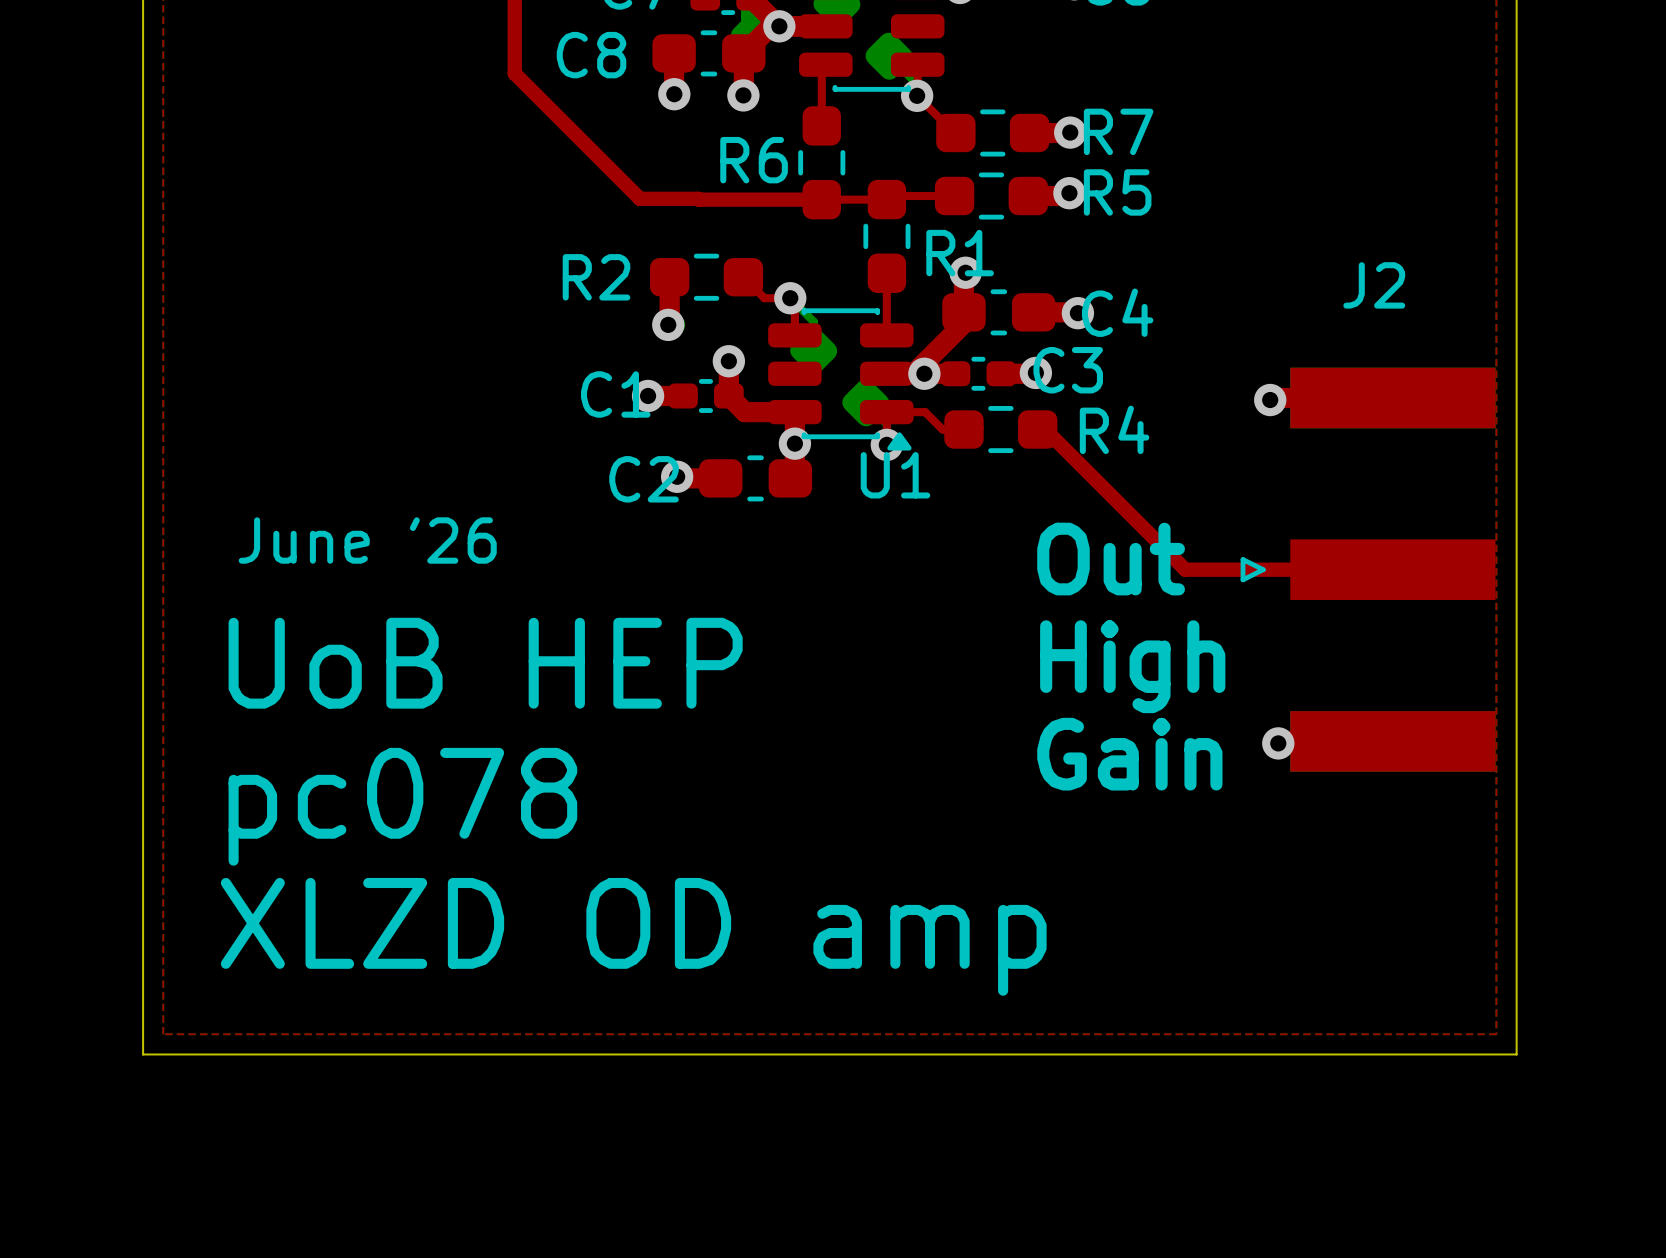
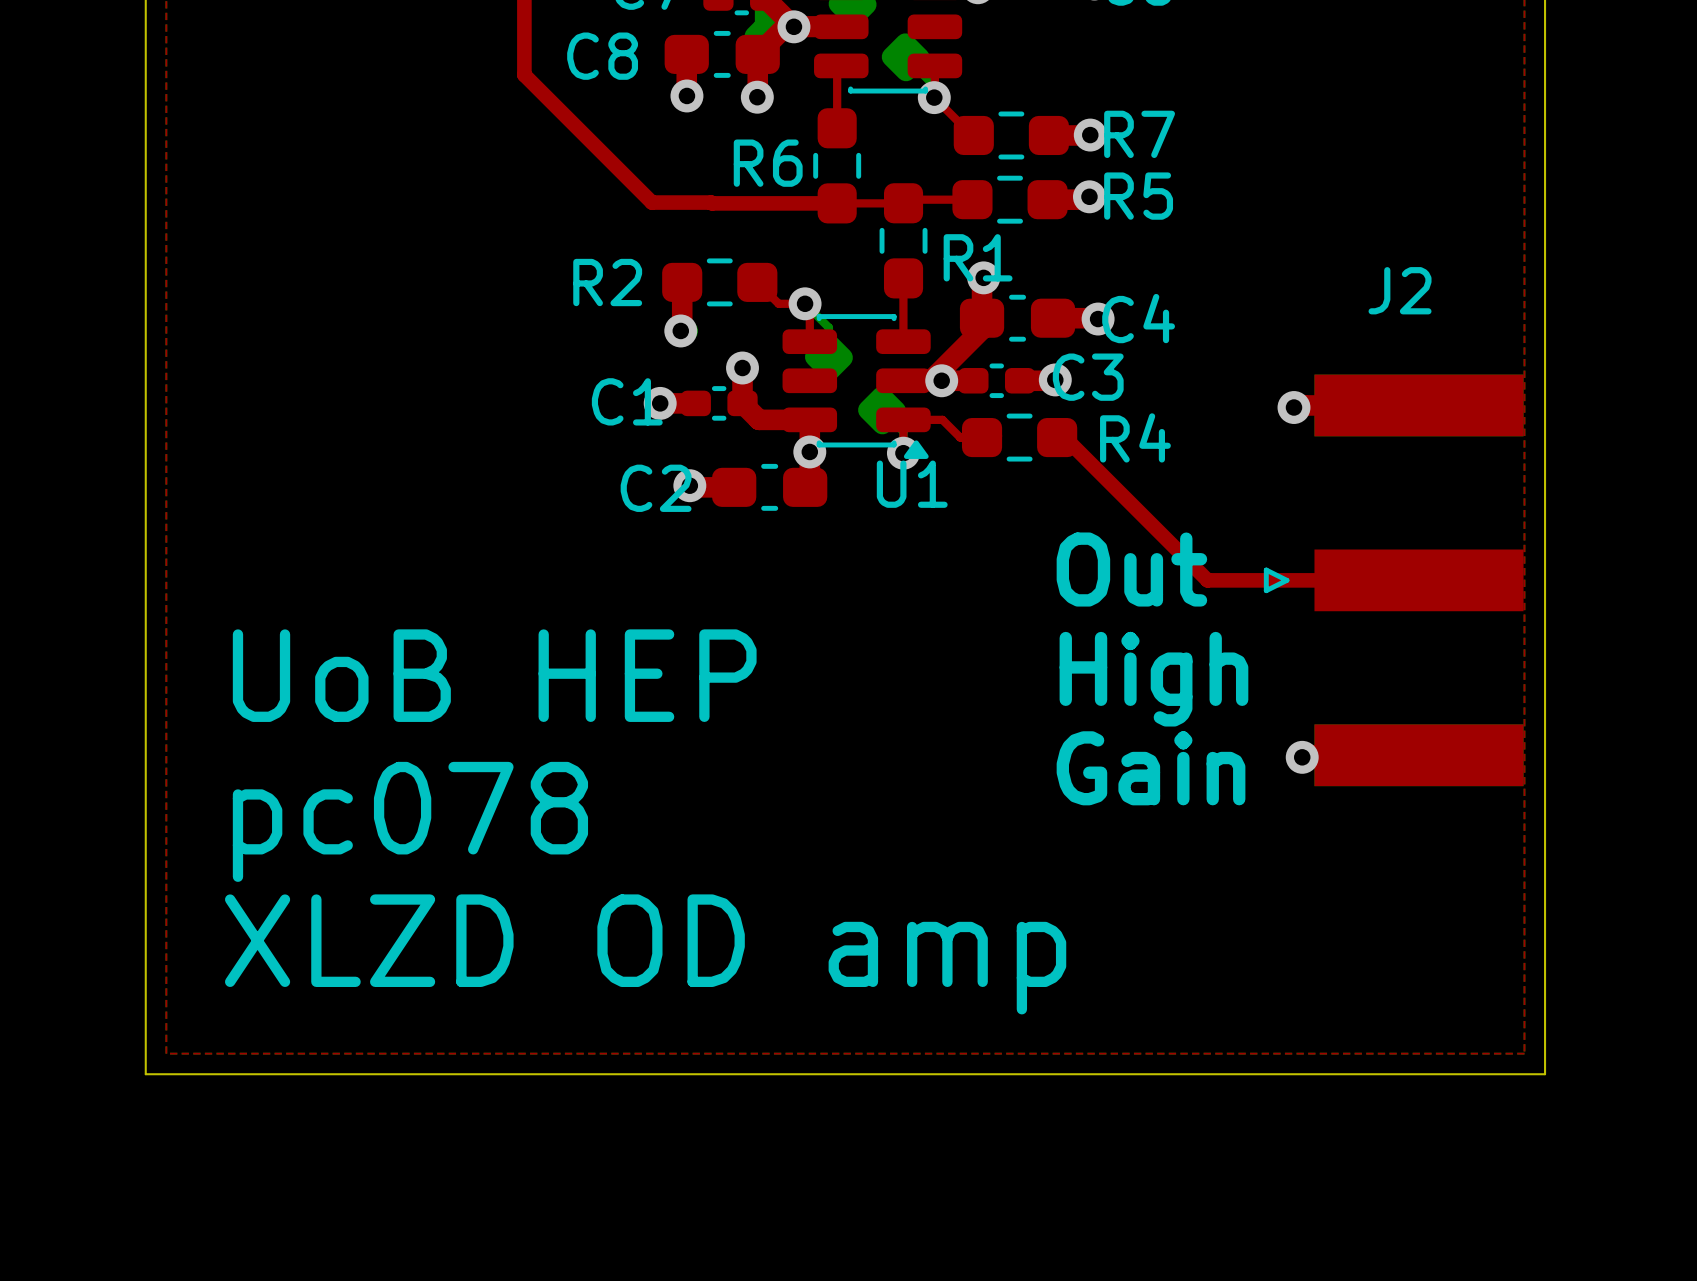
text: June '26 (367, 540) -> none

